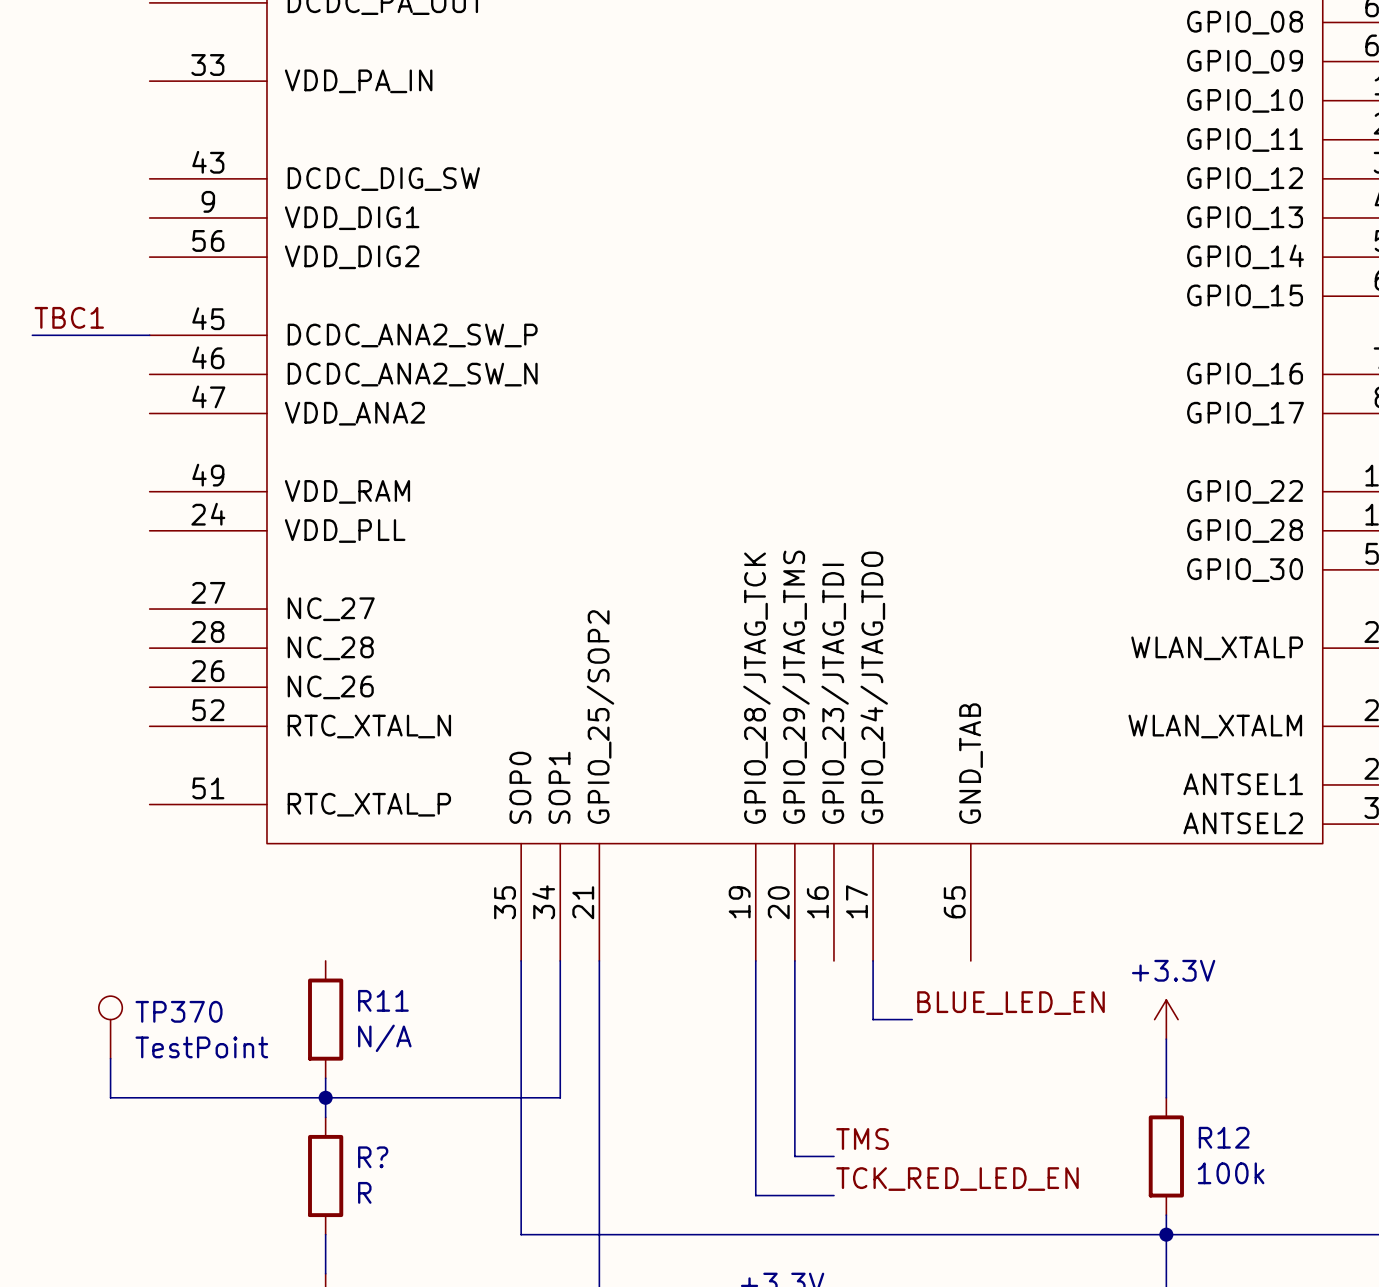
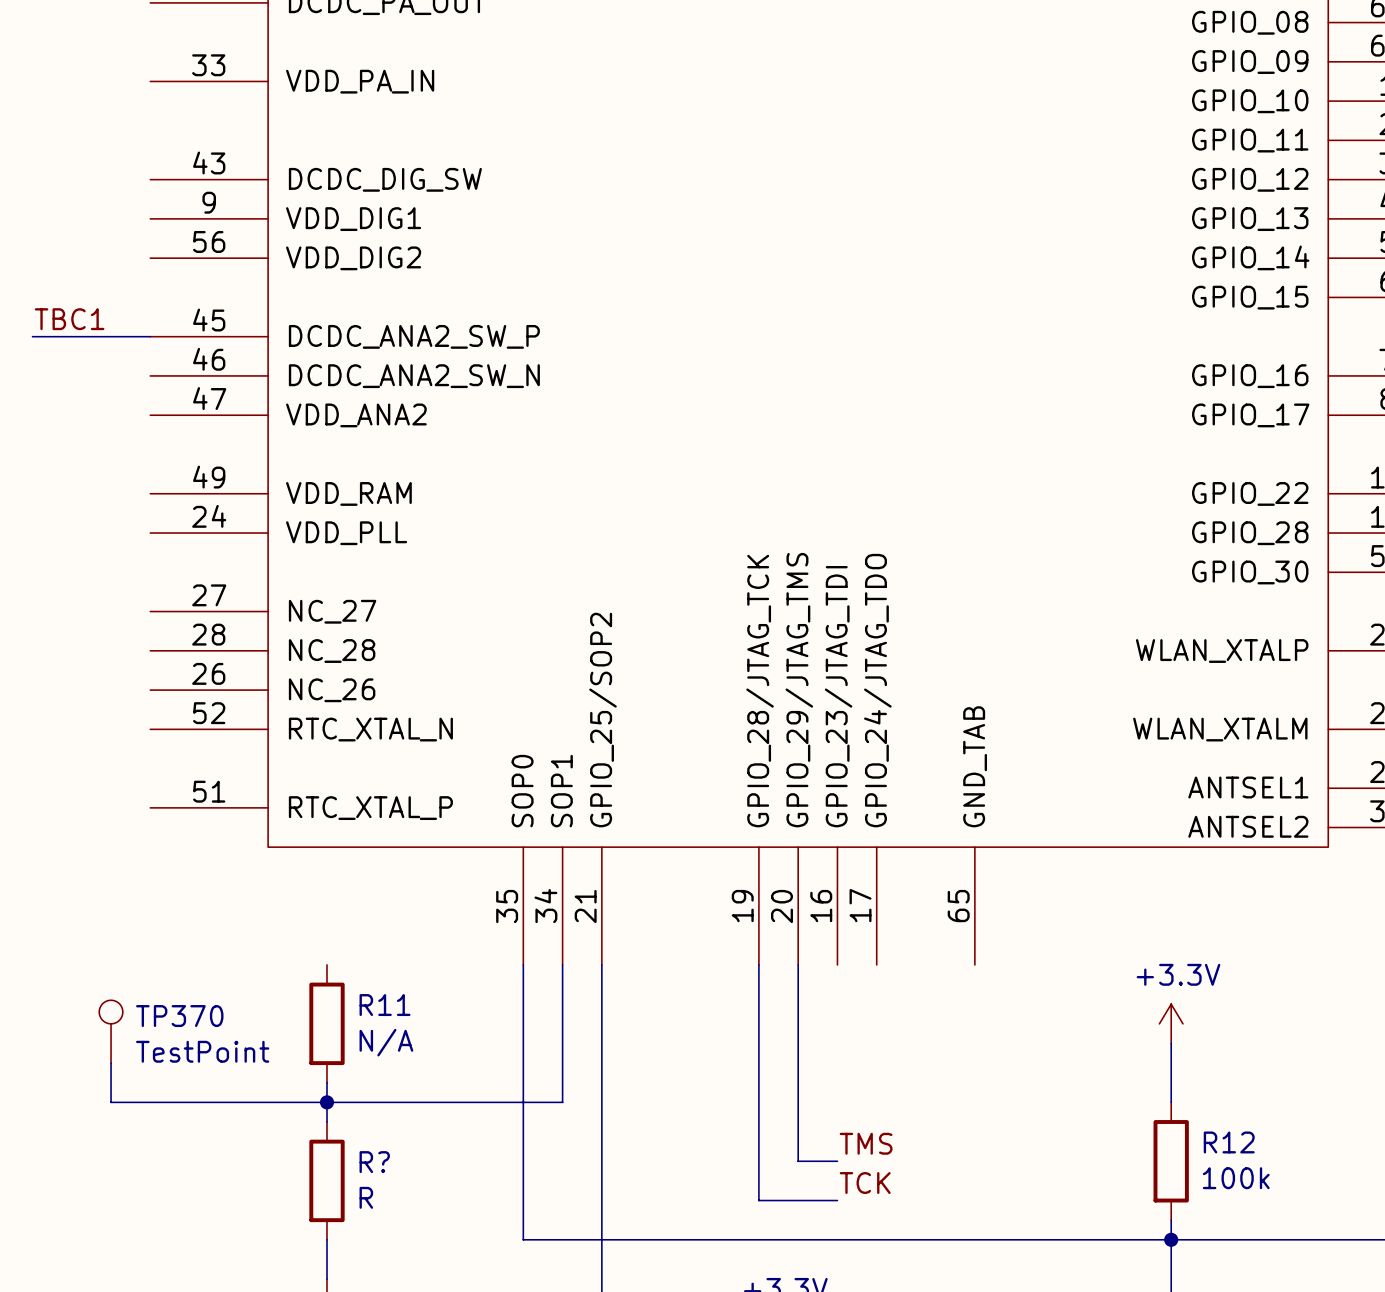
wire: (873, 960) (873, 1019) (912, 1019) -> none
label: BLUE_LED_EN (1011, 1003) -> none
label: TCK_RED_LED_EN (957, 1179) -> TCK (865, 1183)

